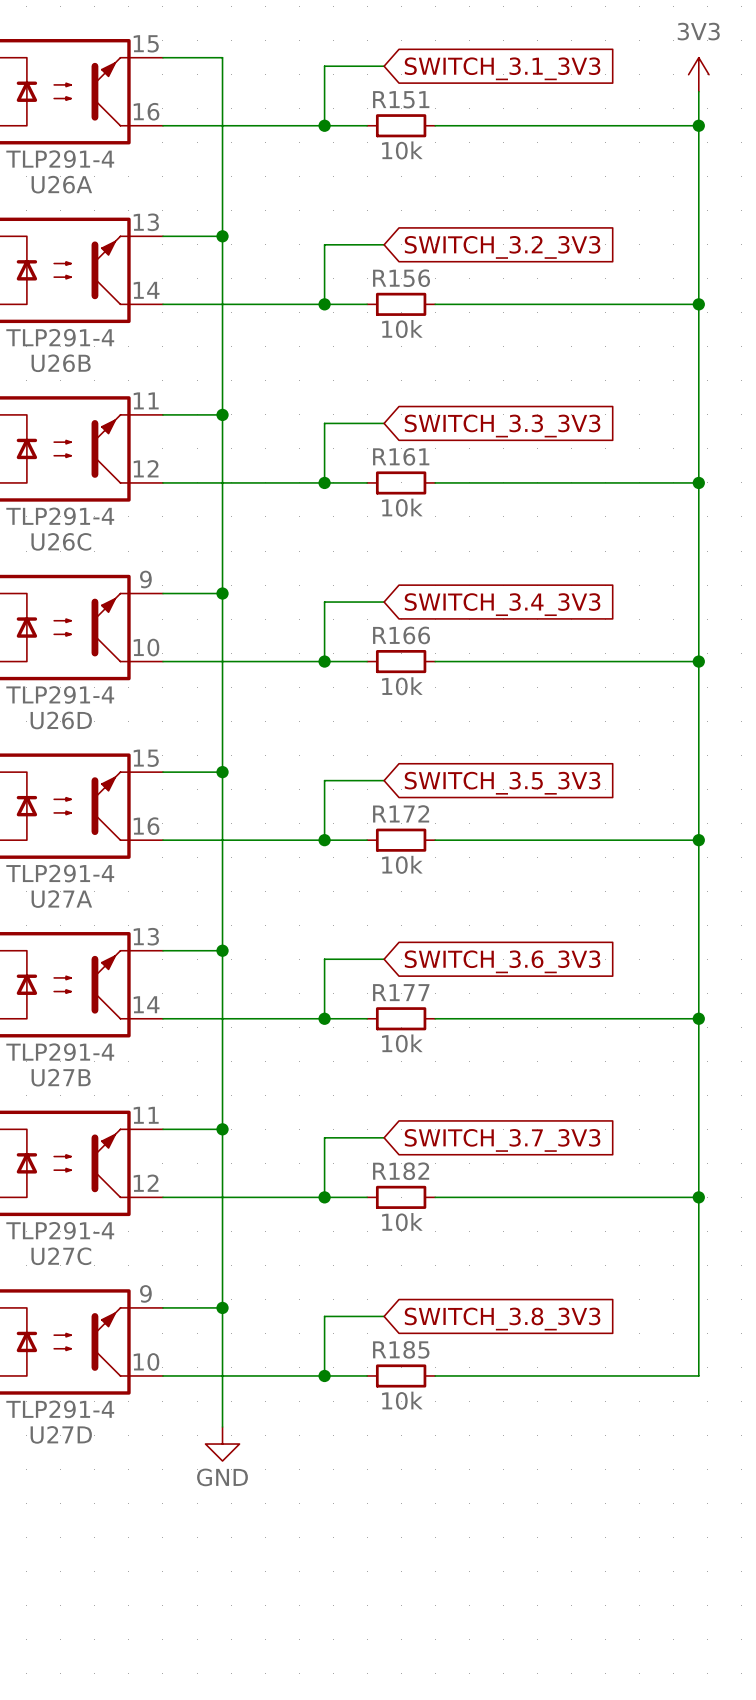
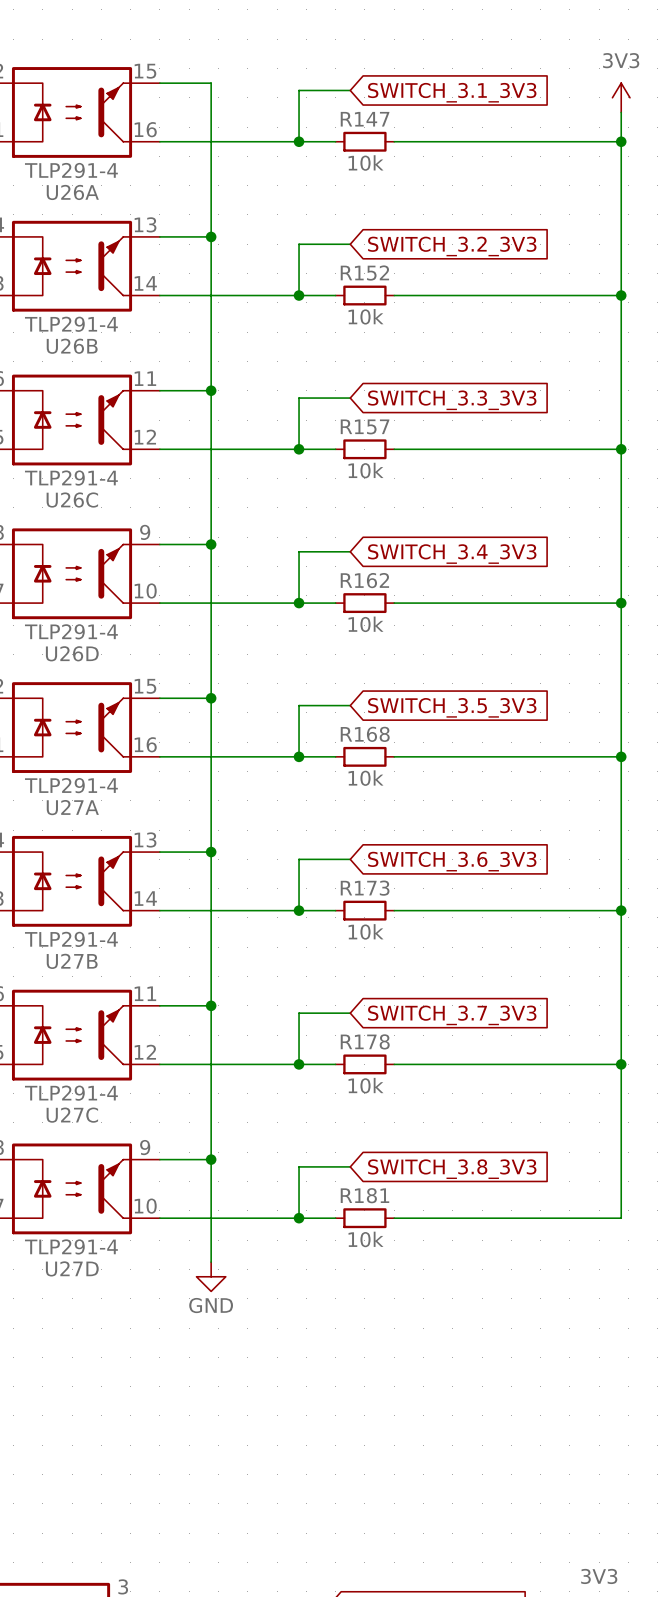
R151 name: R151 (401, 99) -> R147 (365, 119)
R156 name: R156 (401, 278) -> R152 (364, 273)
R161 name: R161 (401, 456) -> R157 (365, 426)
R166 name: R166 (401, 635) -> R162 (364, 580)
R172 name: R172 (401, 813) -> R168 (365, 734)
R177 name: R177 (401, 992) -> R173 (365, 888)
R182 name: R182 (401, 1171) -> R178 (365, 1041)
R185 name: R185 (401, 1349) -> R181 (364, 1195)

